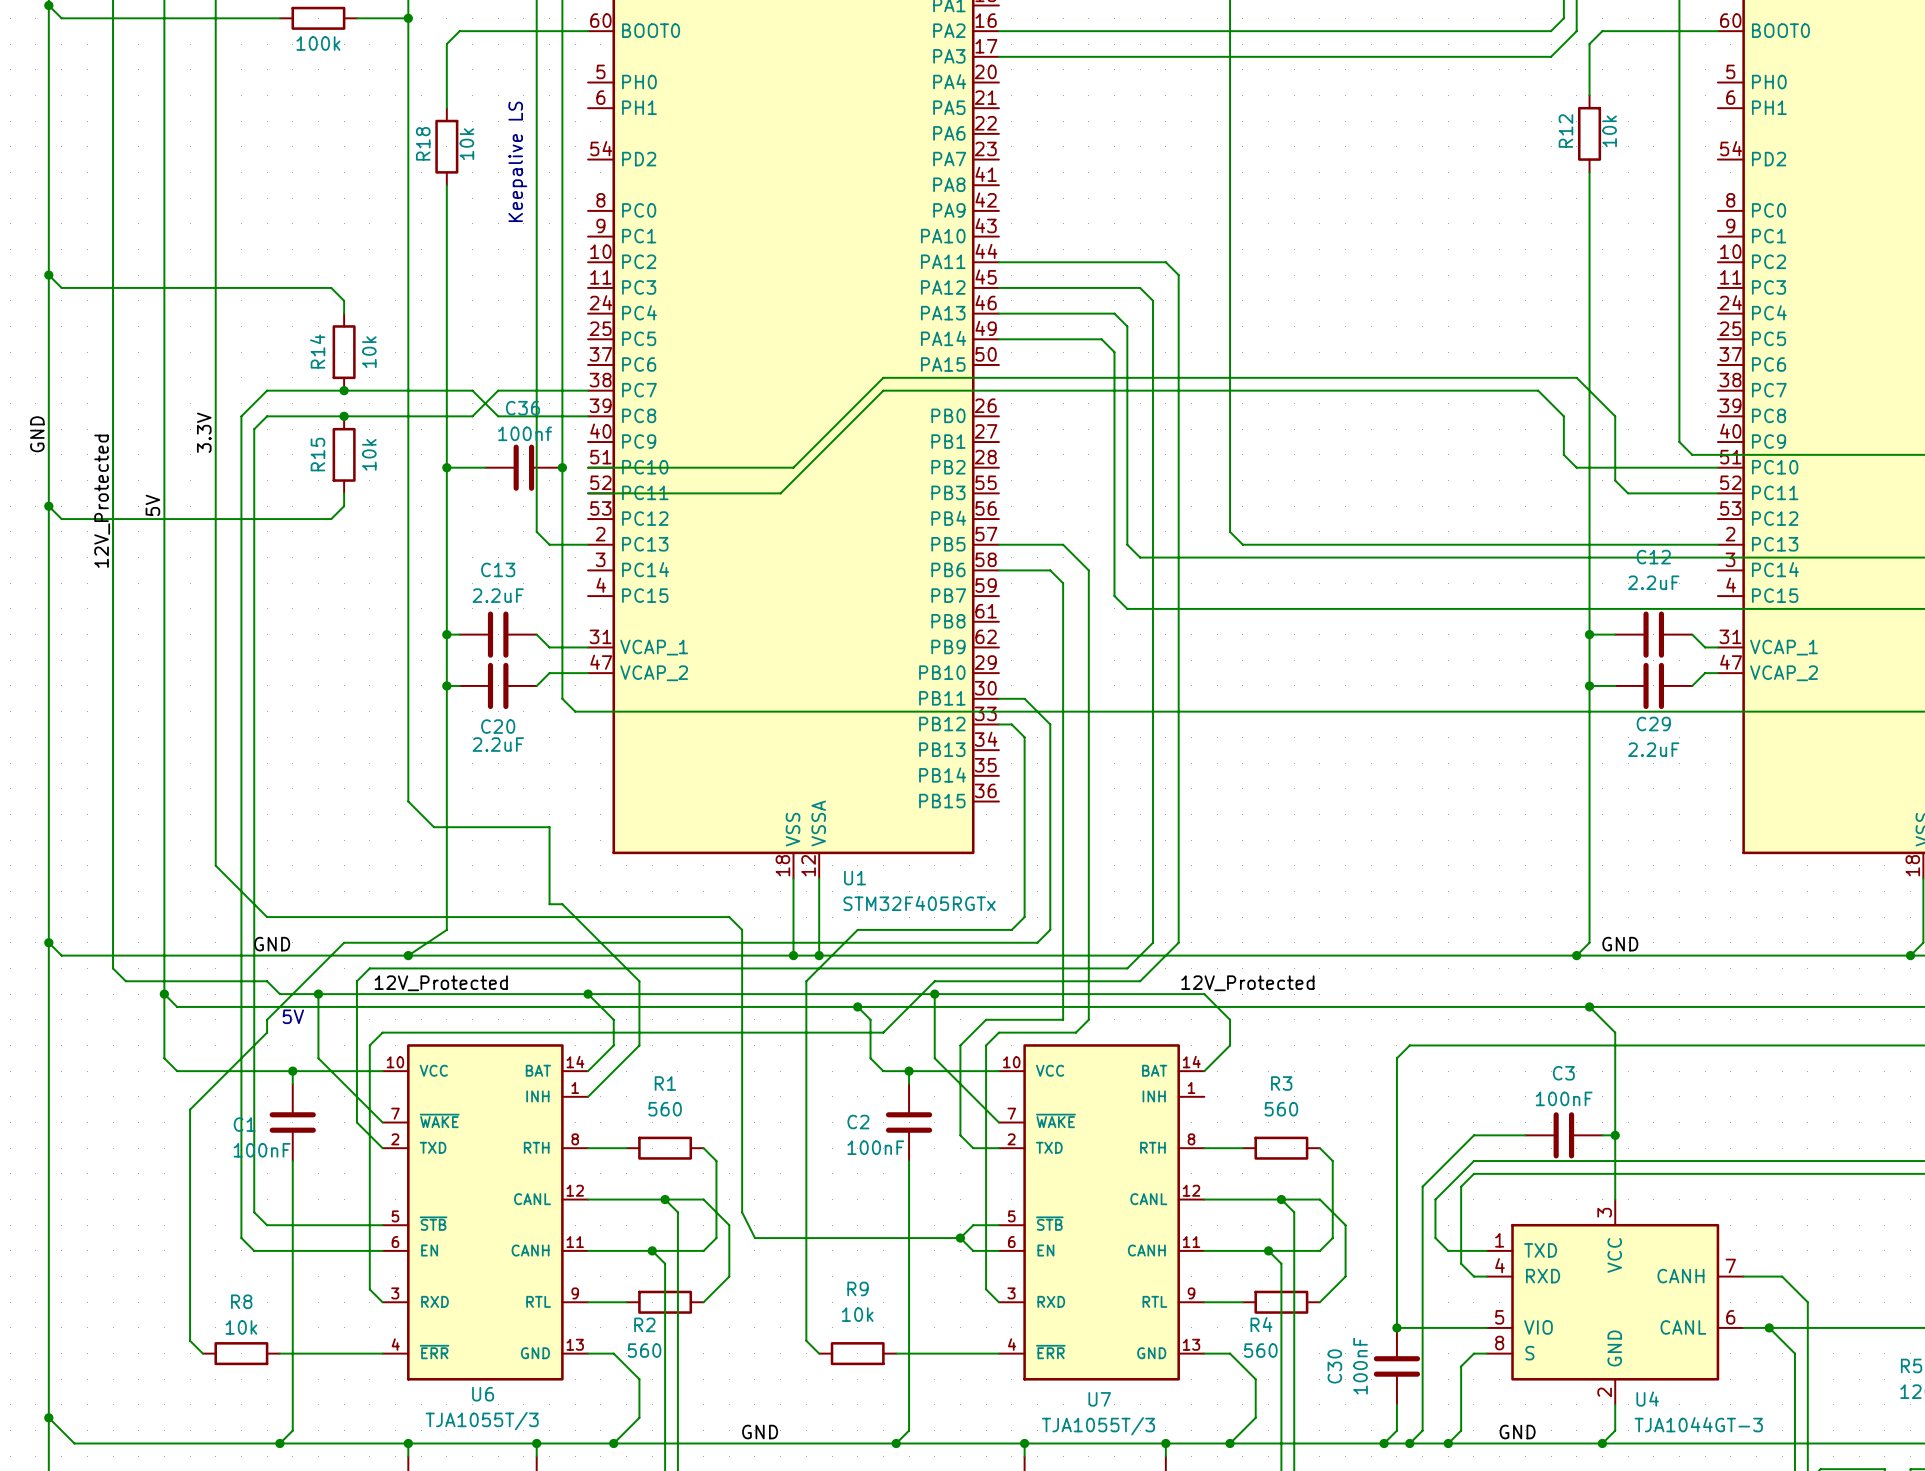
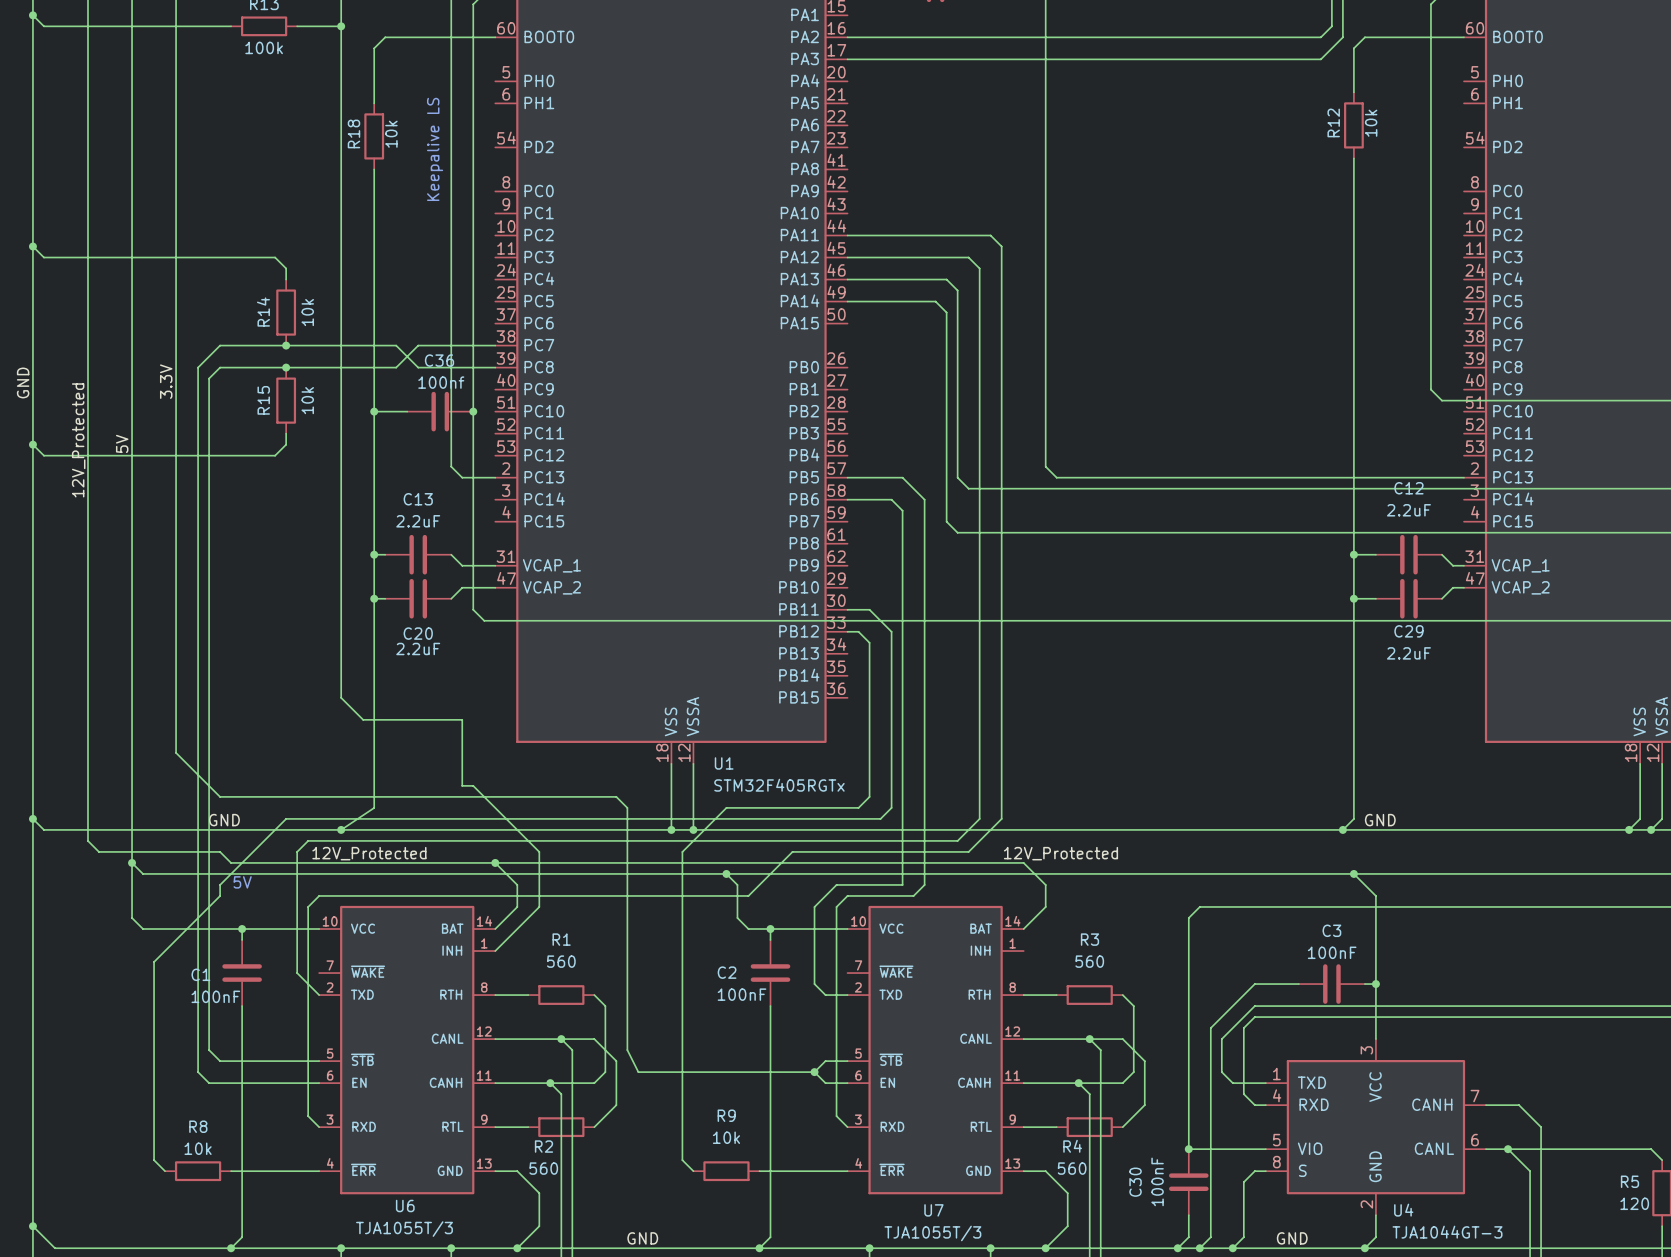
wire: (588, 467) (793, 467) (883, 377) (1576, 377) (1615, 416) (1615, 480) (1628, 493) (1717, 493) -> none
wire: (1717, 467) (1576, 467) (1563, 454) (1563, 416) (1538, 390) (883, 390) (780, 493) (588, 493) -> none
wire: (318, 994) (318, 1058) (382, 1122) -> none
junction: (318, 994) -> none
wire: (934, 994) (934, 1058) (998, 1122) -> none
junction: (934, 994) -> none

